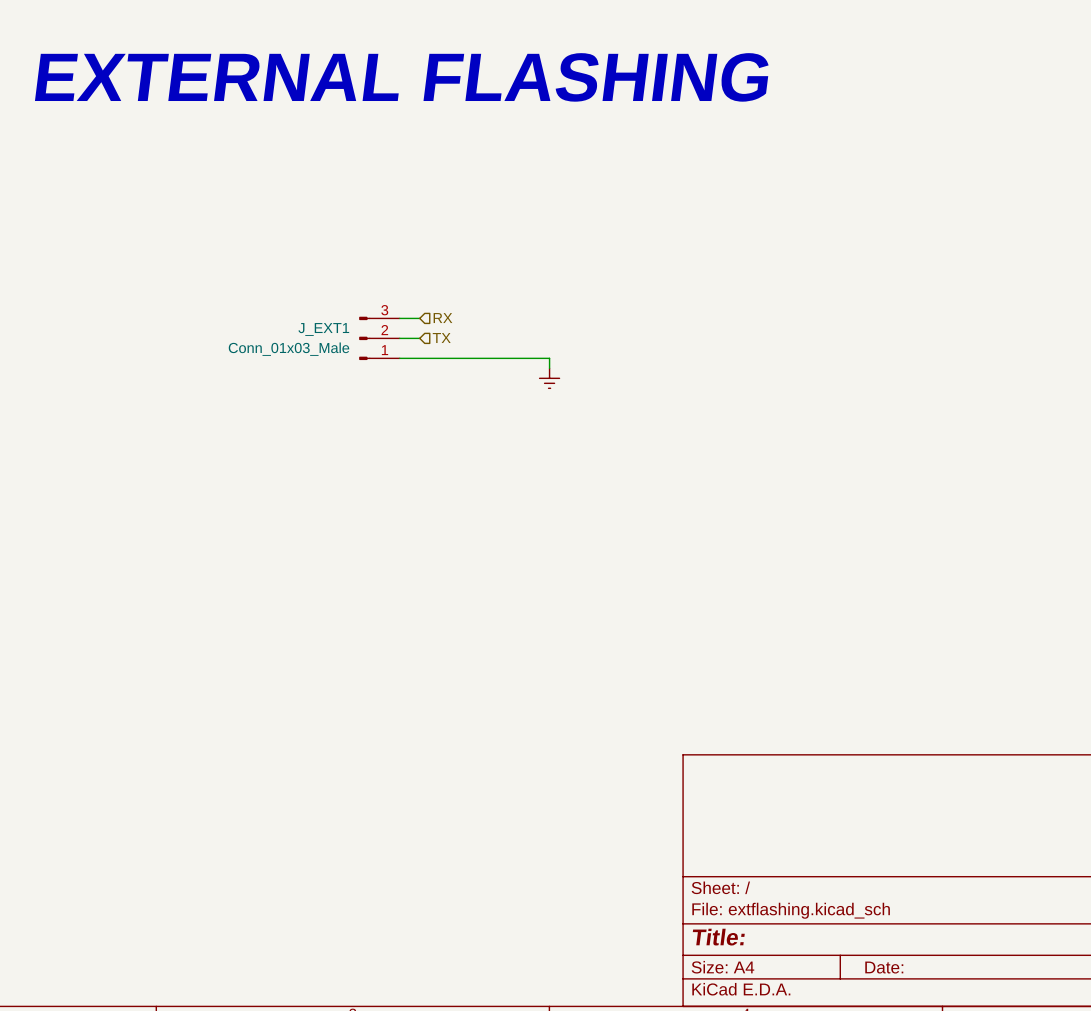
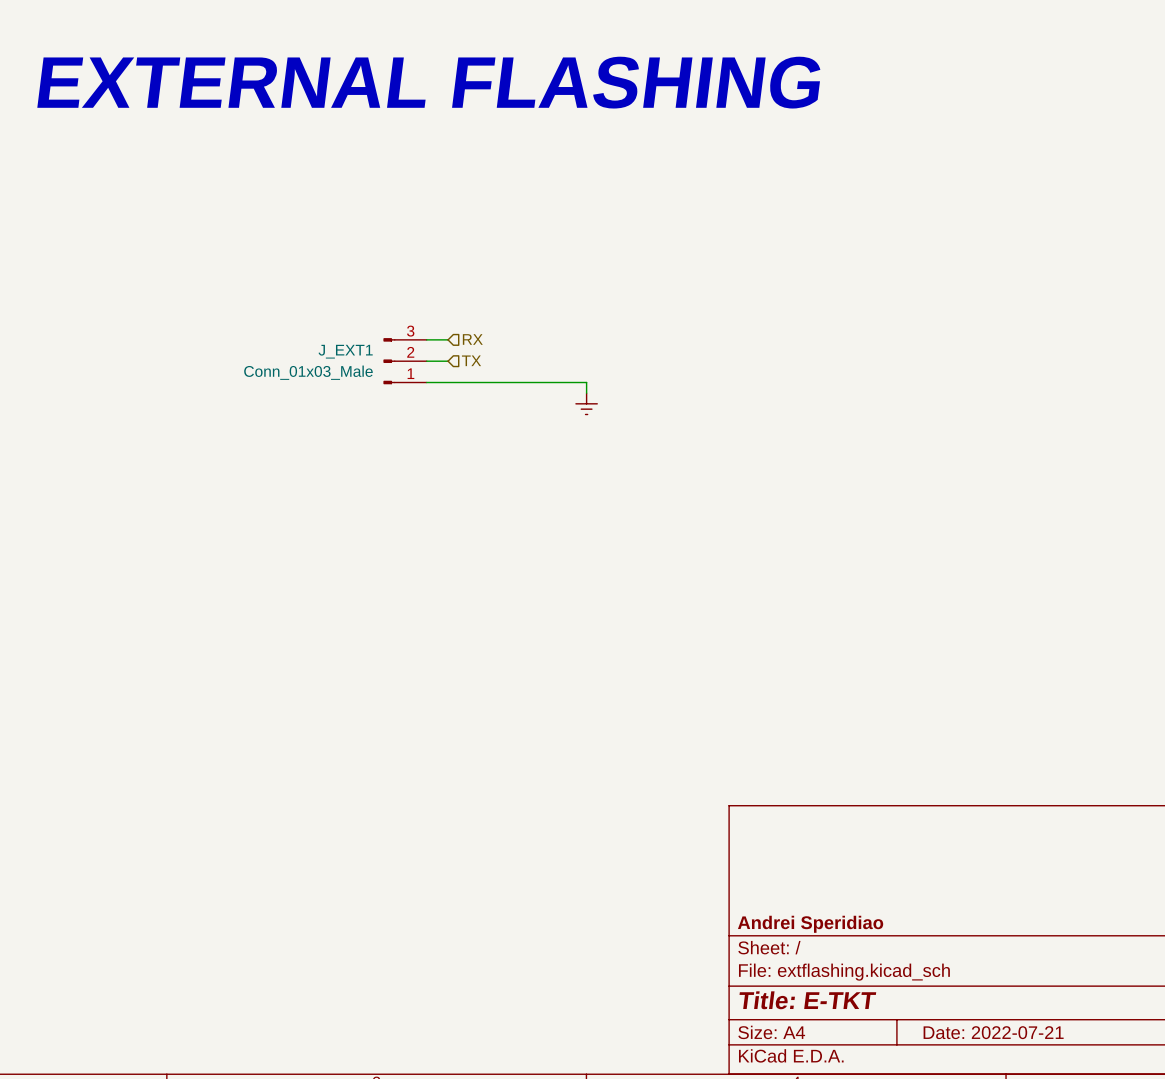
title block: none -> Andrei Speridiao (810, 924)
title block: Title: (718, 937) -> Title: E-TKT (807, 1000)
title block: Date: (884, 967) -> Date: 2022-07-21 (993, 1032)

